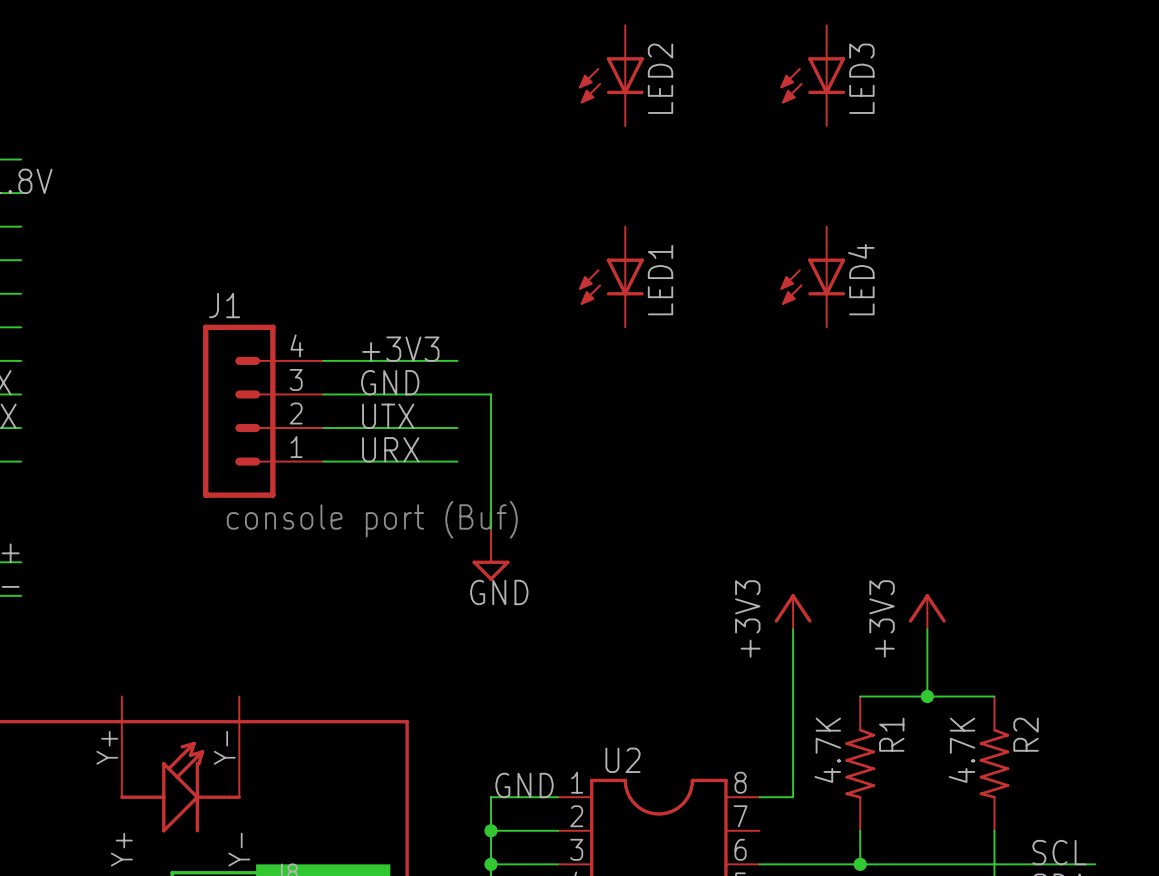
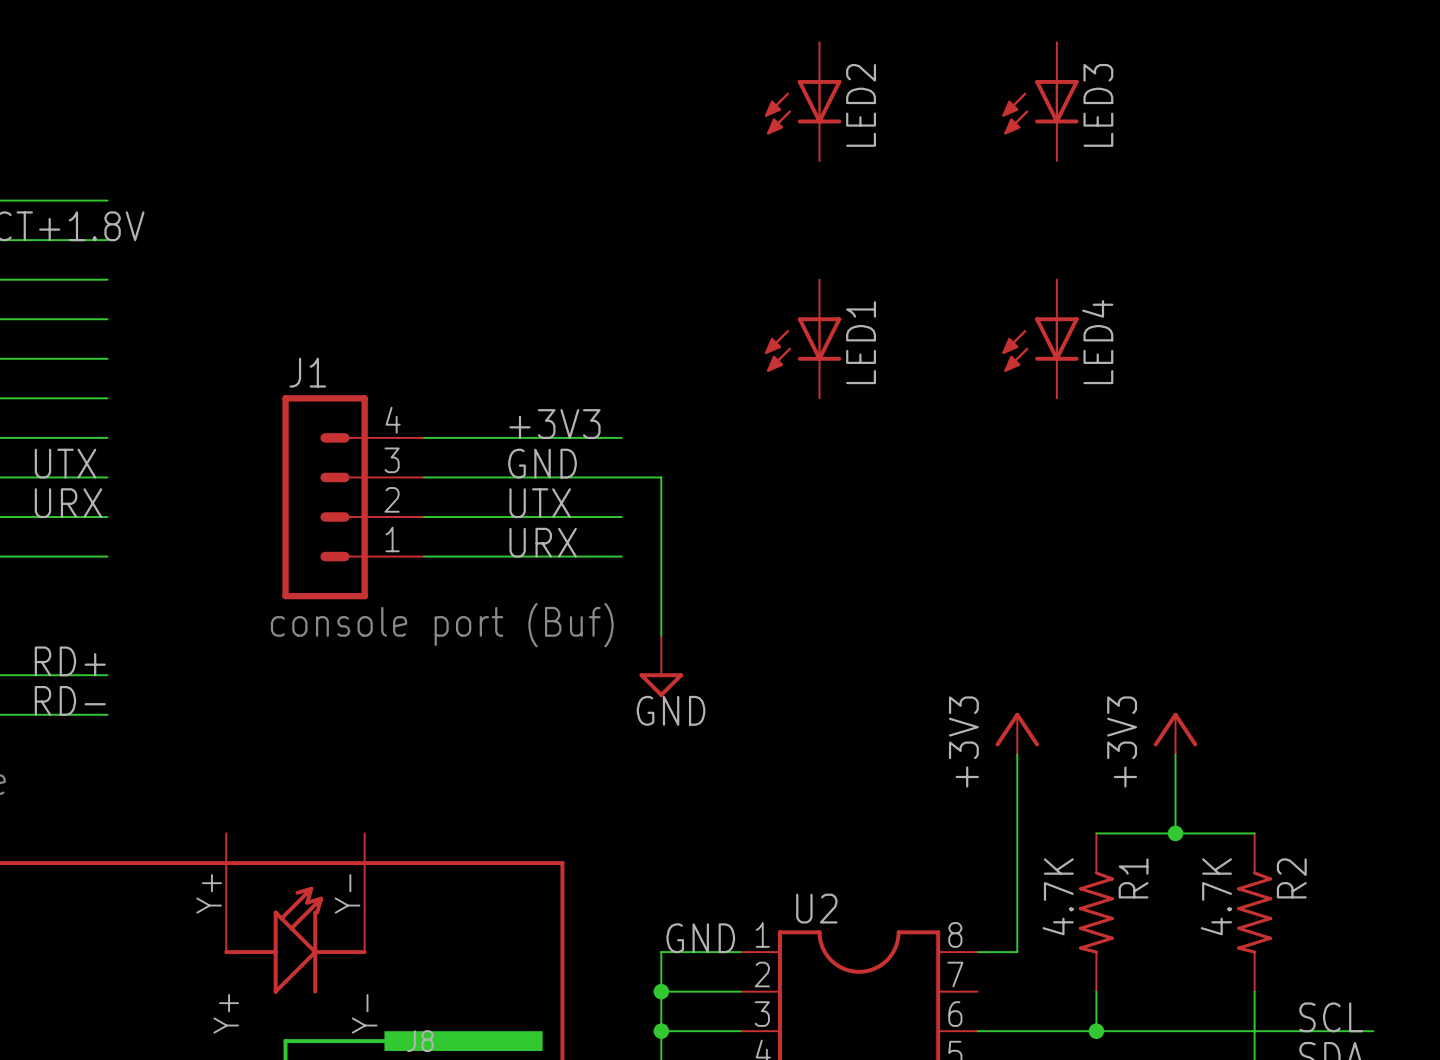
J1 position: (263, 411) -> (353, 497)
text position: console port (Buf) (372, 519) -> console port (Buf) (442, 625)

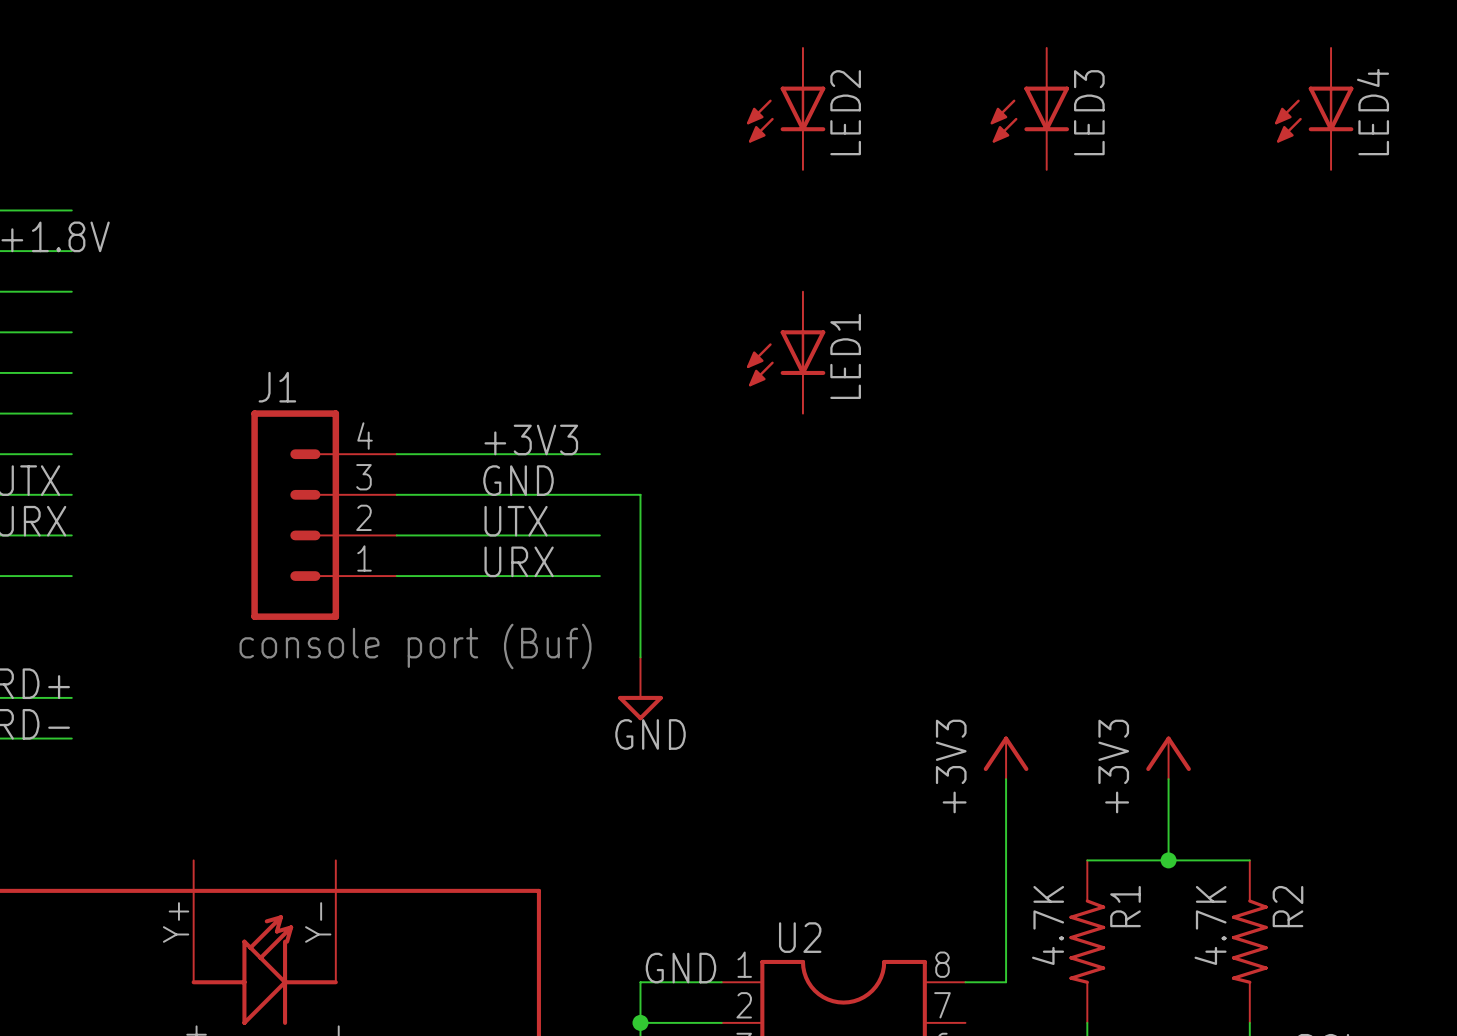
LED4 position: (1040, 339) -> (1314, 108)

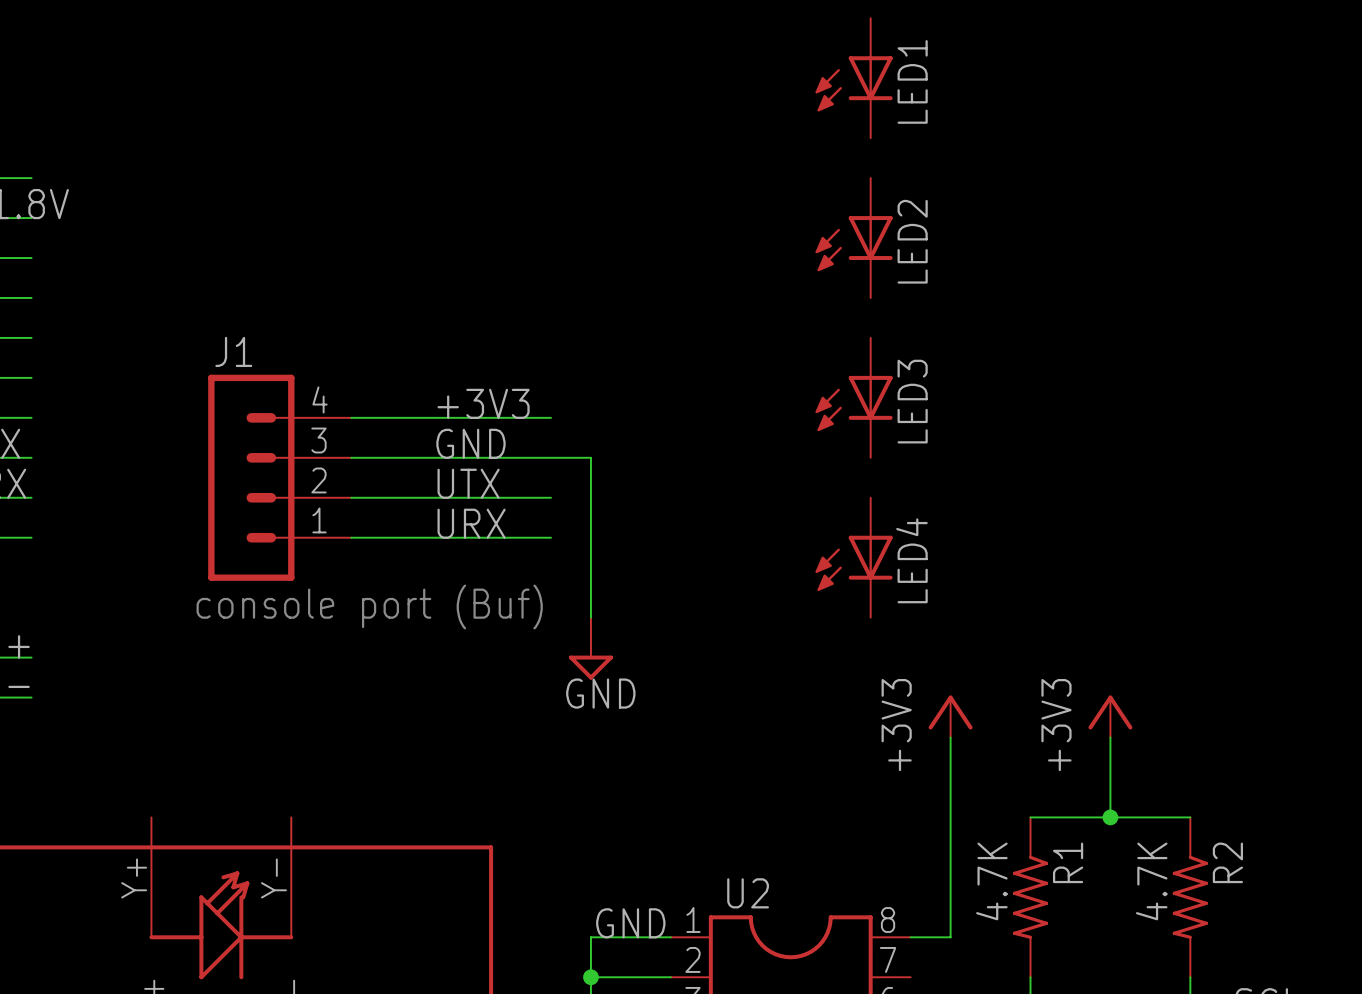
LED2 position: (786, 108) -> (854, 238)
LED3 position: (1029, 108) -> (854, 397)
LED4 position: (1314, 108) -> (854, 557)
LED1 position: (786, 352) -> (854, 78)

